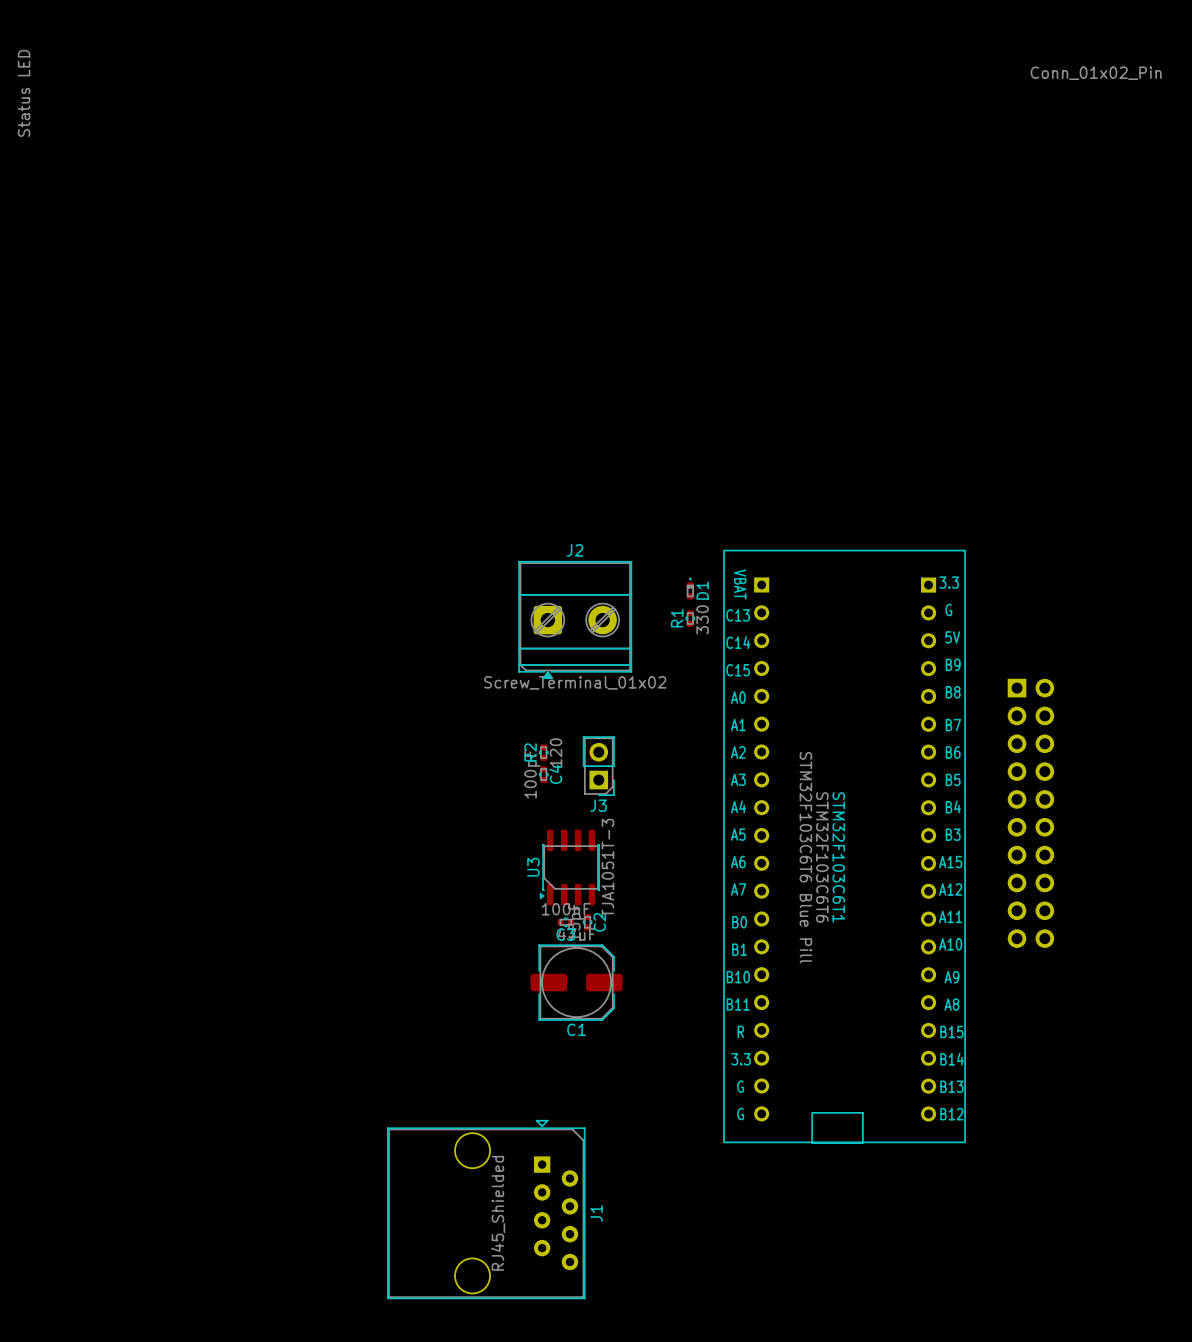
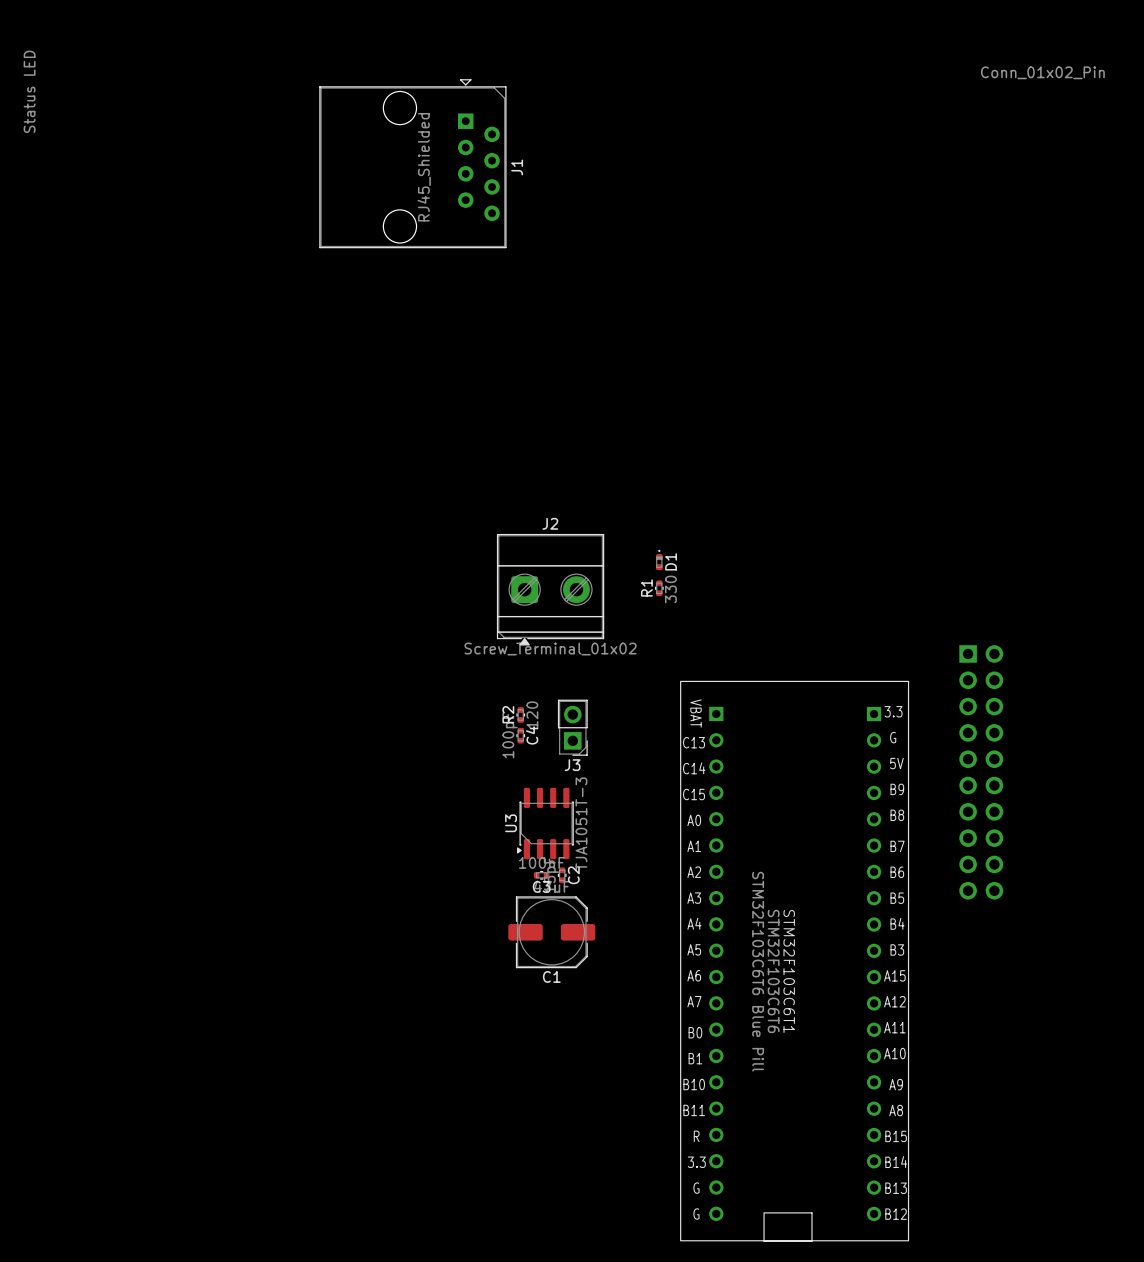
STM32F103C6T1 position: (844, 846) -> (794, 961)
J1 position: (486, 1209) -> (412, 163)

